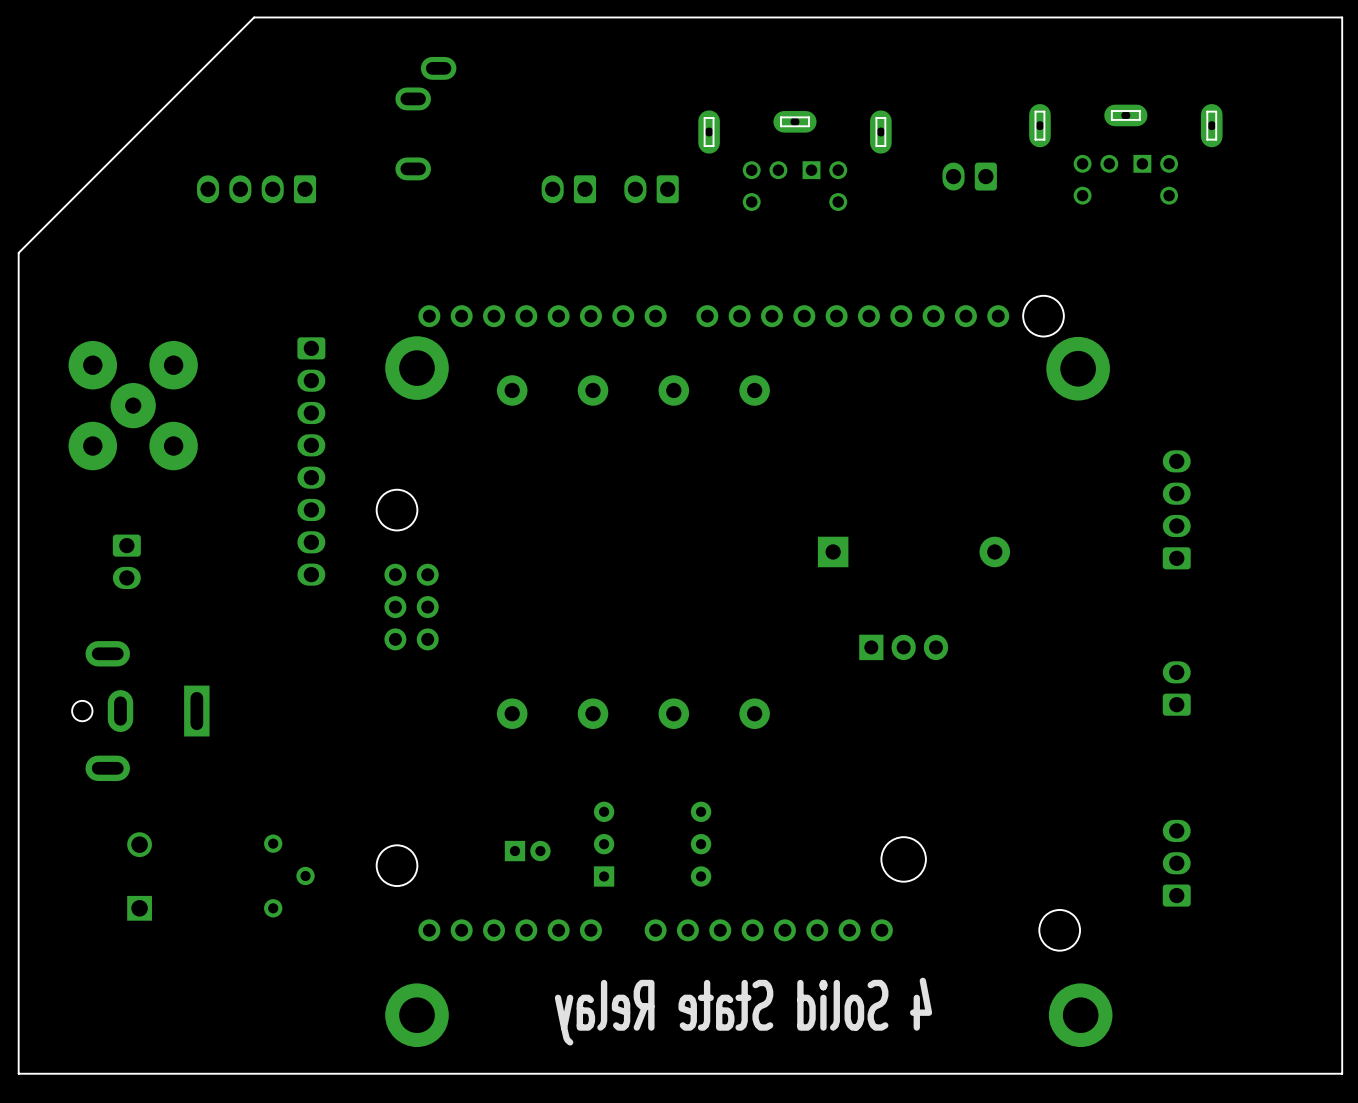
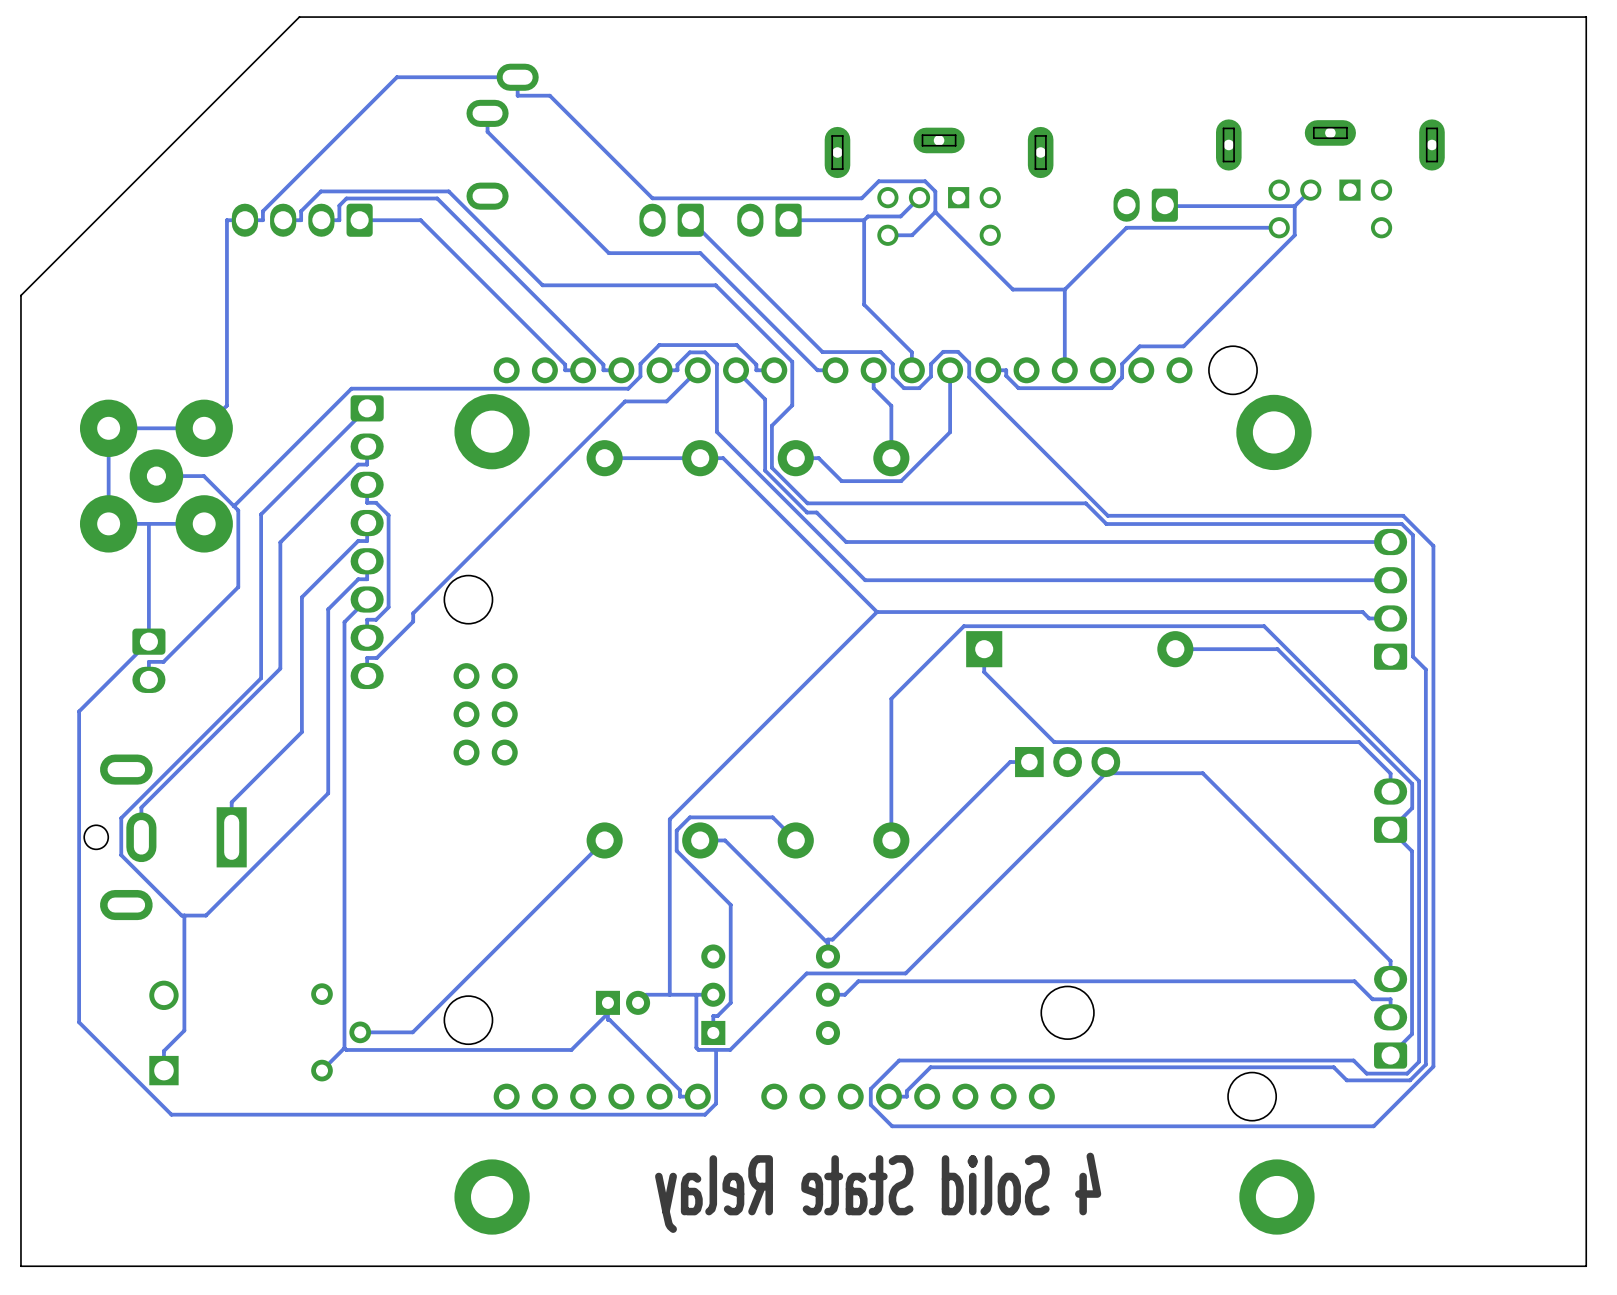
track: none -> (487, 113) (487, 131) (608, 253) (700, 253) (817, 370) (835, 370)
track: none -> (1310, 190) (1294, 206) (1164, 205)
track: none -> (919, 197) (900, 216) (867, 216) (864, 220)
track: none -> (1294, 206) (1294, 235) (1183, 346) (1139, 346) (1122, 363) (1122, 377) (1111, 388) (1018, 388) (1006, 375) (1006, 370) (988, 370)
track: none -> (935, 212) (935, 191) (925, 181) (878, 181) (861, 198) (652, 198) (549, 95) (517, 95) (517, 77) (396, 77) (262, 211) (262, 220) (226, 220) (226, 405) (204, 428) (108, 428) (108, 523) (204, 523)
track: none -> (935, 212) (912, 235) (887, 235)
track: none -> (935, 212) (1012, 289) (1064, 289)
track: none -> (283, 220) (301, 220) (301, 211) (320, 191) (448, 191) (542, 285) (715, 285) (792, 361) (792, 405) (771, 425) (771, 467) (807, 503) (1085, 503) (1106, 524) (1401, 524) (1413, 535) (1413, 656) (1425, 669) (1425, 1064) (1410, 1080) (1346, 1080) (1333, 1067) (930, 1067) (906, 1091) (906, 1096) (888, 1096)
track: none -> (321, 220) (339, 220) (339, 205) (346, 198) (437, 198) (603, 364) (603, 370) (621, 370)
track: none -> (359, 220) (420, 220) (565, 364) (565, 370) (583, 370)
track: none -> (690, 220) (822, 352) (880, 352) (892, 364) (892, 376) (903, 388) (919, 388) (931, 376) (931, 364) (943, 351) (958, 351) (969, 363) (969, 377) (1107, 515) (1403, 515) (1433, 546) (1433, 1066) (1373, 1126) (892, 1126) (870, 1104) (870, 1088) (899, 1060) (1353, 1060) (1366, 1073) (1407, 1073) (1419, 1061) (1419, 781) (1264, 626) (963, 626) (891, 698) (891, 840)
track: none -> (864, 220) (788, 220)
track: none -> (864, 220) (864, 304) (911, 352) (911, 370)
track: none -> (1279, 227) (1126, 227) (1064, 289)
track: none -> (1064, 289) (1064, 370)
track: none -> (659, 370) (677, 370) (677, 364) (689, 352) (705, 352) (716, 364) (716, 431) (865, 580) (1390, 580)
track: none -> (697, 370) (666, 401) (625, 401) (413, 613) (413, 621) (376, 657) (367, 657) (367, 675)
track: none -> (736, 370) (765, 399) (765, 470) (807, 512) (816, 512) (846, 542) (1390, 542)
track: none -> (774, 370) (756, 370) (756, 364) (736, 345) (659, 345) (640, 363) (640, 376) (628, 388) (351, 388) (234, 506)
track: none -> (873, 370) (873, 388) (891, 405) (891, 458)
track: none -> (950, 370) (950, 432) (901, 481) (841, 481) (818, 458) (795, 458)
track: none -> (367, 408) (261, 514) (261, 678) (121, 818) (121, 855) (181, 915) (205, 915) (328, 793) (328, 609) (358, 579) (367, 579) (367, 561)
track: none -> (367, 446) (367, 464) (358, 464) (280, 542) (280, 668) (141, 807) (141, 837)
track: none -> (604, 458) (723, 458) (877, 612)
track: none -> (156, 476) (203, 476) (238, 510) (238, 587) (163, 661) (148, 661) (148, 679)
track: none -> (367, 484) (367, 502) (376, 502) (388, 515) (388, 607) (376, 619) (367, 619) (367, 637)
track: none -> (367, 523) (367, 541) (358, 541) (301, 597) (301, 732) (231, 802) (231, 837)
track: none -> (148, 523) (148, 641) (79, 711) (79, 1022) (171, 1114) (705, 1114) (716, 1103) (716, 1049)
track: none -> (367, 599) (344, 622) (344, 1048)
track: none -> (877, 612) (1362, 612) (1369, 618) (1390, 618)
track: none -> (877, 612) (669, 819) (669, 994)
track: none -> (984, 649) (984, 672) (1054, 742) (1359, 742) (1390, 773) (1390, 791)
track: none -> (1175, 649) (1277, 649) (1412, 783) (1412, 808) (1390, 829) (1412, 851) (1412, 1034) (1390, 1055)
track: none -> (1029, 762) (1010, 762) (832, 939) (827, 939) (827, 956)
track: none -> (1105, 773) (905, 973) (806, 973) (730, 1049) (698, 1049) (696, 1047) (696, 994)
track: none -> (1105, 773) (1202, 773) (1390, 961) (1390, 979)
track: none -> (604, 840) (412, 1032) (360, 1032)
track: none -> (700, 840) (725, 840) (827, 943)
track: none -> (795, 840) (772, 817) (689, 817) (676, 830) (676, 850) (730, 904) (730, 1002) (717, 1016) (713, 1016) (713, 1032)
track: none -> (184, 915) (184, 1030) (163, 1051) (163, 1070)
track: none -> (713, 994) (646, 994) (638, 1002)
track: none -> (827, 994) (844, 994) (858, 981) (1354, 981) (1372, 999) (1390, 999) (1390, 1017)
track: none -> (607, 1002) (607, 1019) (679, 1090) (679, 1096) (697, 1096)
track: none -> (607, 1013) (571, 1049) (346, 1049) (344, 1048)
track: none -> (344, 1048) (321, 1070)

